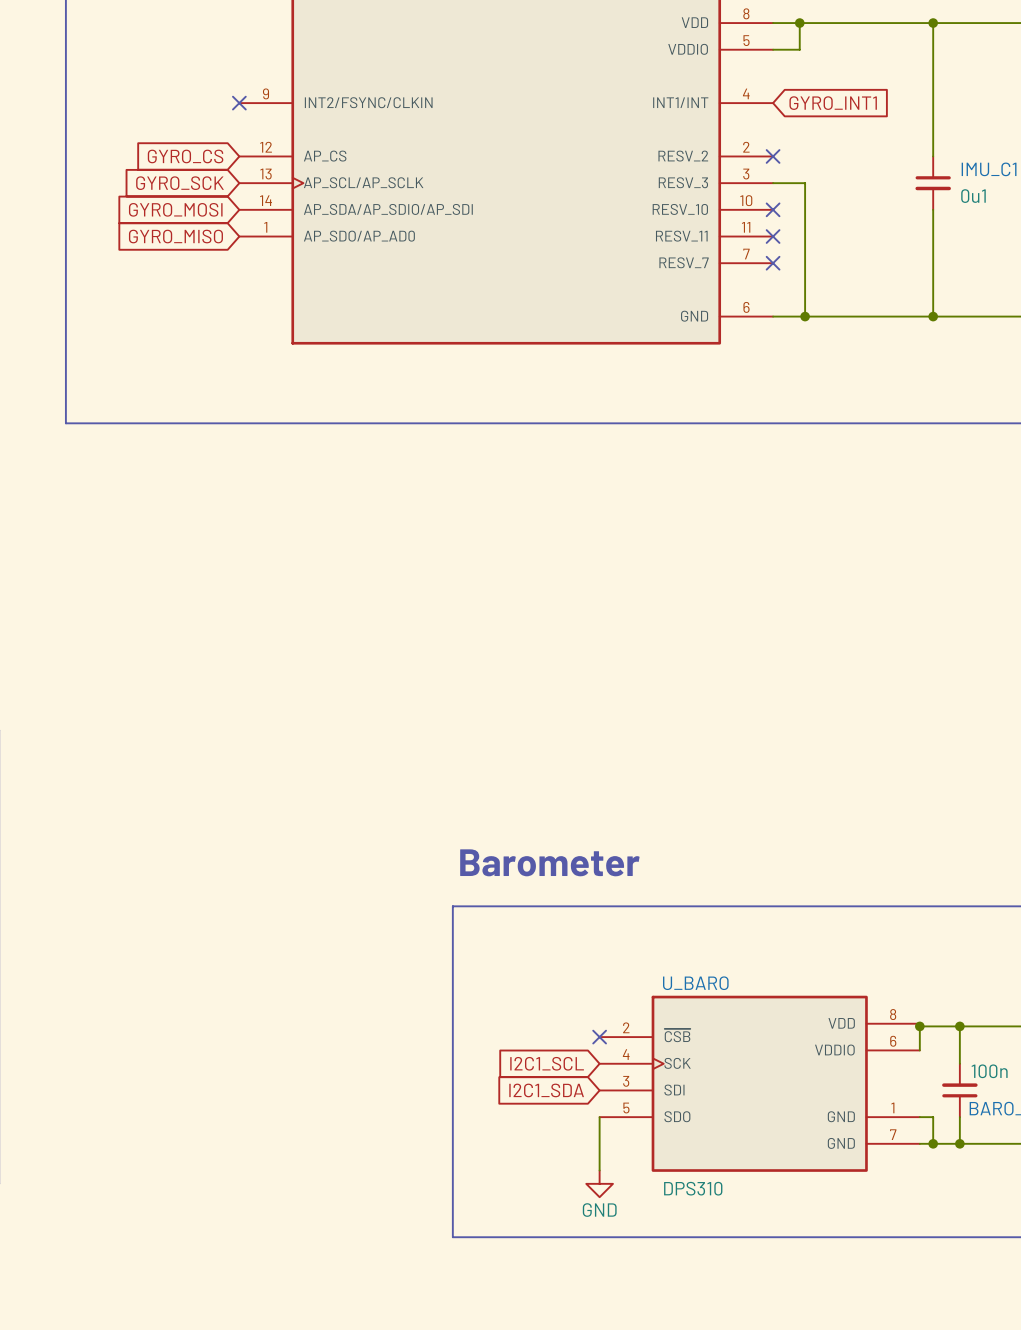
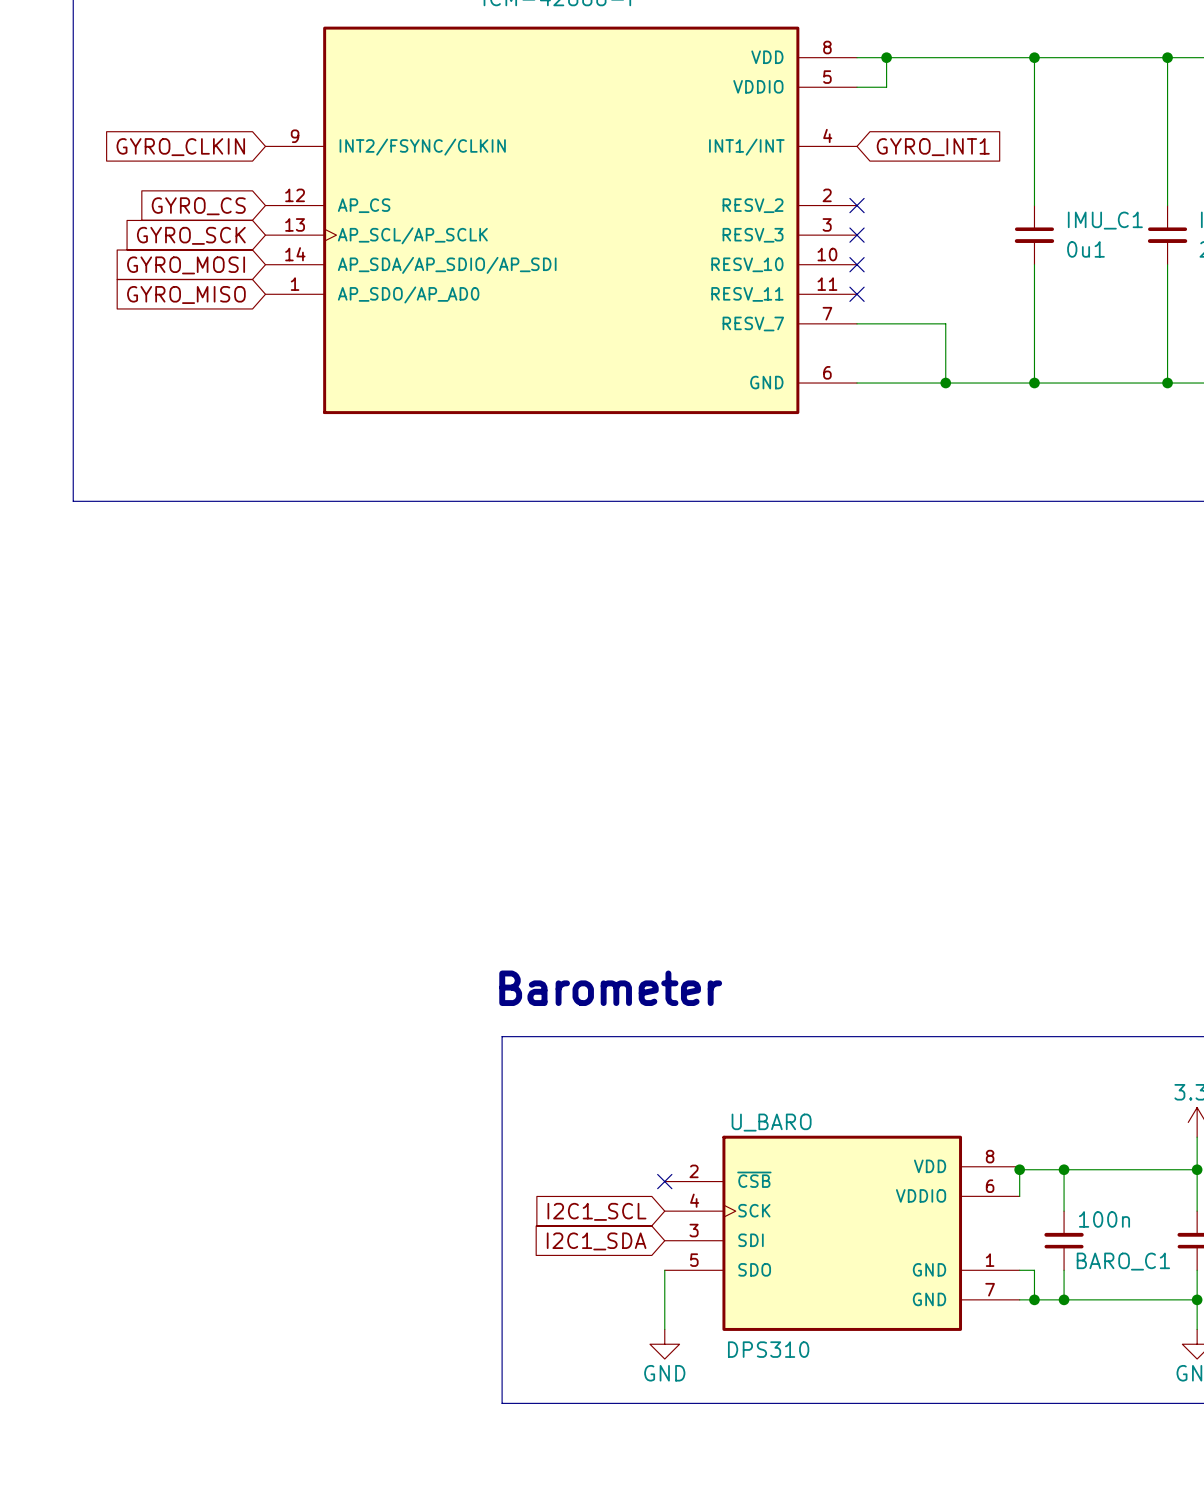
global label: none -> GYRO_CLKIN (180, 147)
no-connect mark: (239, 103) -> none
wire: (773, 183) (805, 183) (805, 316) -> none
no-connect mark: none -> (857, 235)
wire: none -> (857, 323) (945, 323) (945, 383)
no-connect mark: (773, 263) -> none
junction position: (805, 316) -> (945, 383)

